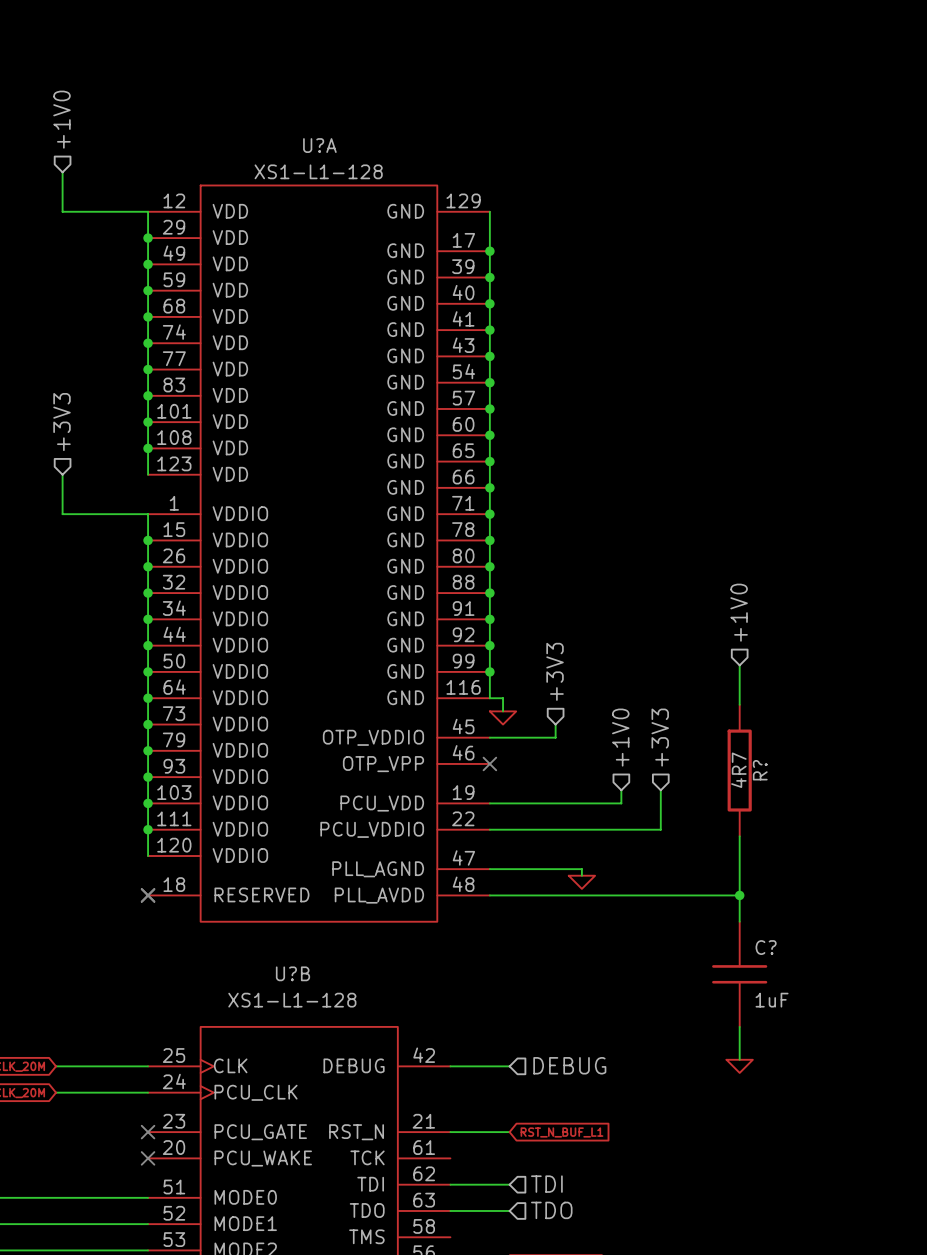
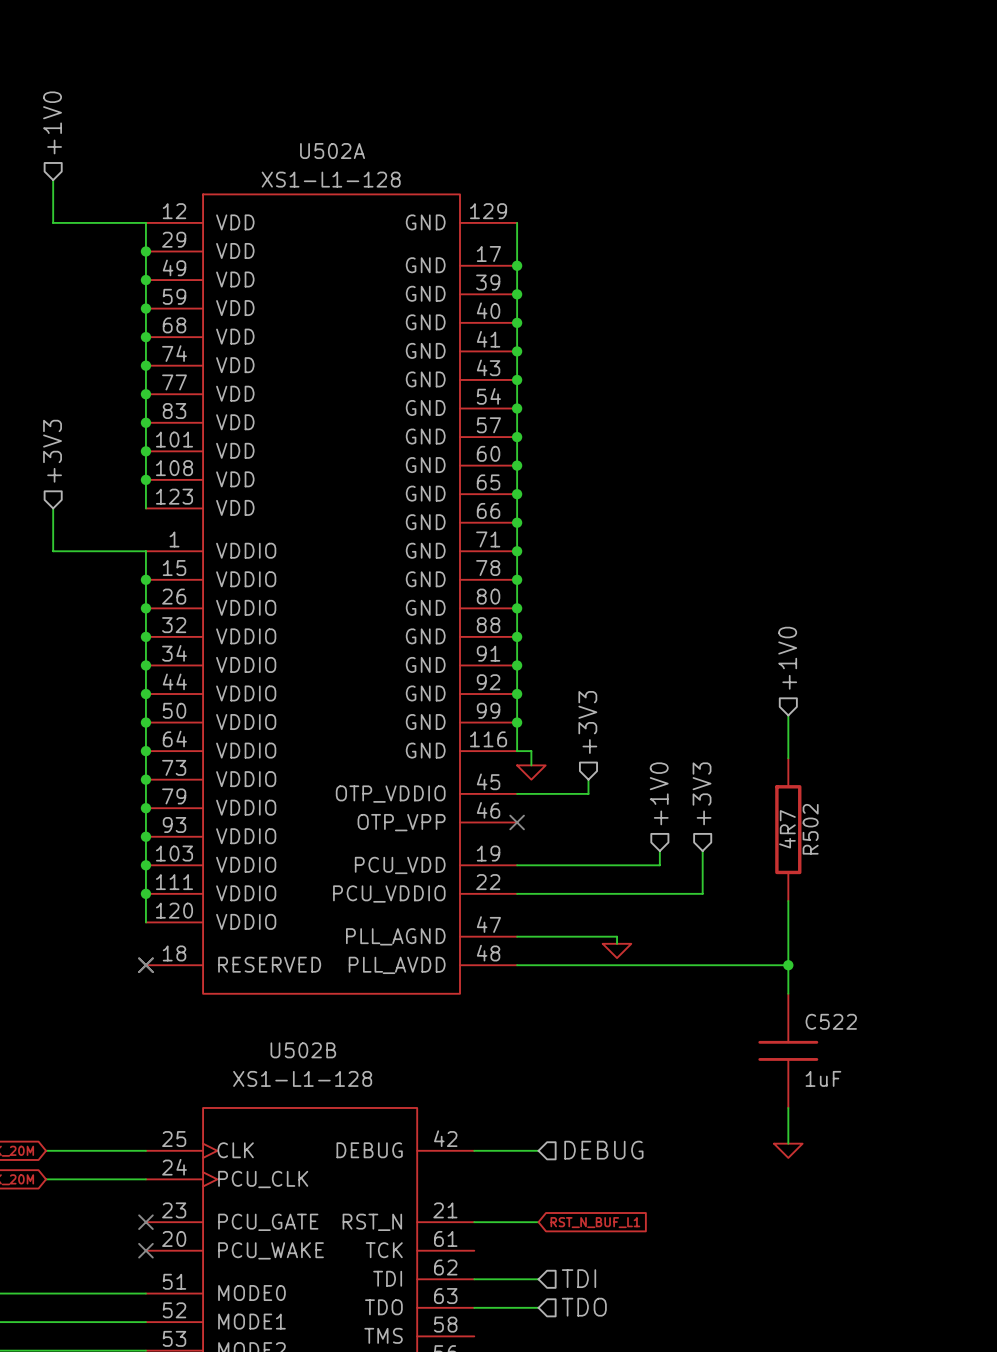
U?A name: U?A (319, 145) -> U502A (332, 151)
R? name: R? (760, 770) -> R502 (810, 829)
C? name: C? (766, 947) -> C522 (831, 1021)
U?B name: U?B (292, 973) -> U502B (303, 1050)

